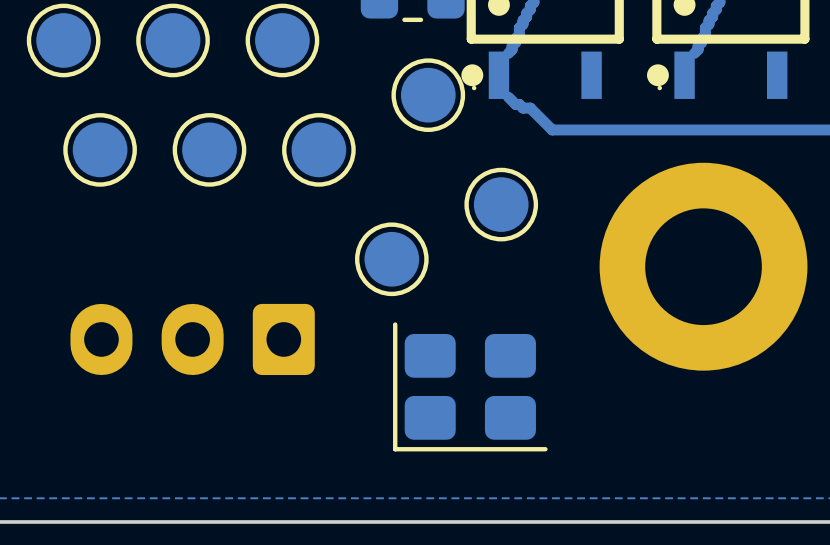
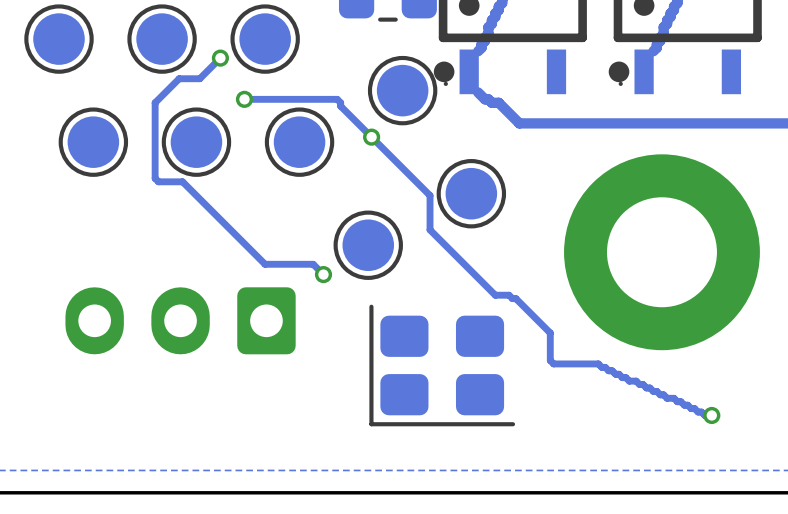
track: none -> (220, 58) (199, 78) (179, 78) (155, 102) (155, 178) (158, 181) (182, 181) (265, 264) (313, 264) (323, 274)
via: none -> (220, 58)
track: none -> (244, 99) (337, 99) (340, 102) (340, 106) (430, 195) (430, 229) (495, 295) (509, 295) (512, 298) (515, 298) (550, 333) (550, 360) (553, 363) (598, 363) (629, 381) (636, 381) (646, 387) (656, 391) (667, 398) (674, 398) (704, 415) (711, 415)
via: none -> (244, 99)
via: none -> (371, 137)
via: none -> (323, 274)
via: none -> (711, 415)

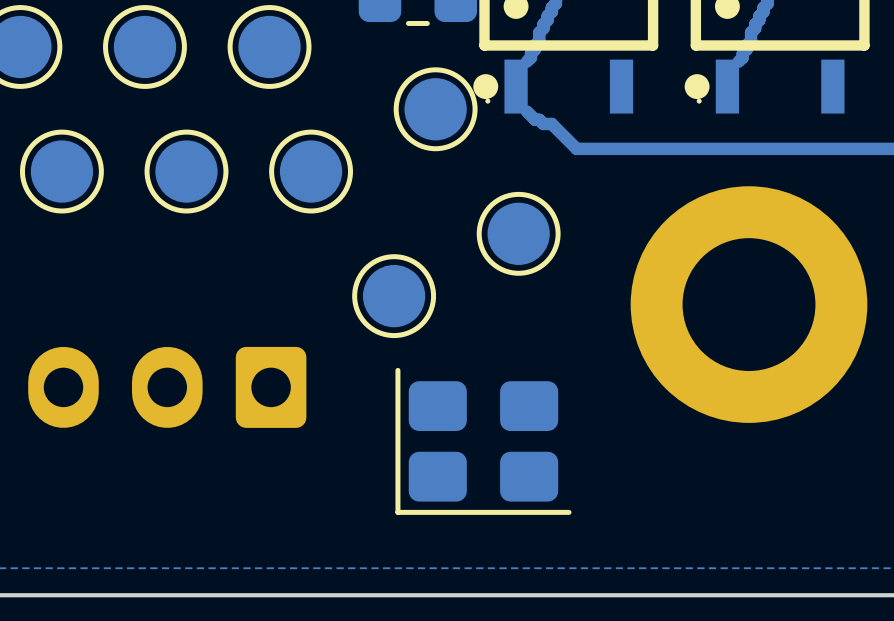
track: (220, 58) (199, 78) (179, 78) (155, 102) (155, 178) (158, 181) (182, 181) (265, 264) (313, 264) (323, 274) -> none
via: (220, 58) -> none
track: (244, 99) (337, 99) (340, 102) (340, 106) (430, 195) (430, 229) (495, 295) (509, 295) (512, 298) (515, 298) (550, 333) (550, 360) (553, 363) (598, 363) (629, 381) (636, 381) (646, 387) (656, 391) (667, 398) (674, 398) (704, 415) (711, 415) -> none
via: (244, 99) -> none
via: (371, 137) -> none
via: (323, 274) -> none
via: (711, 415) -> none

